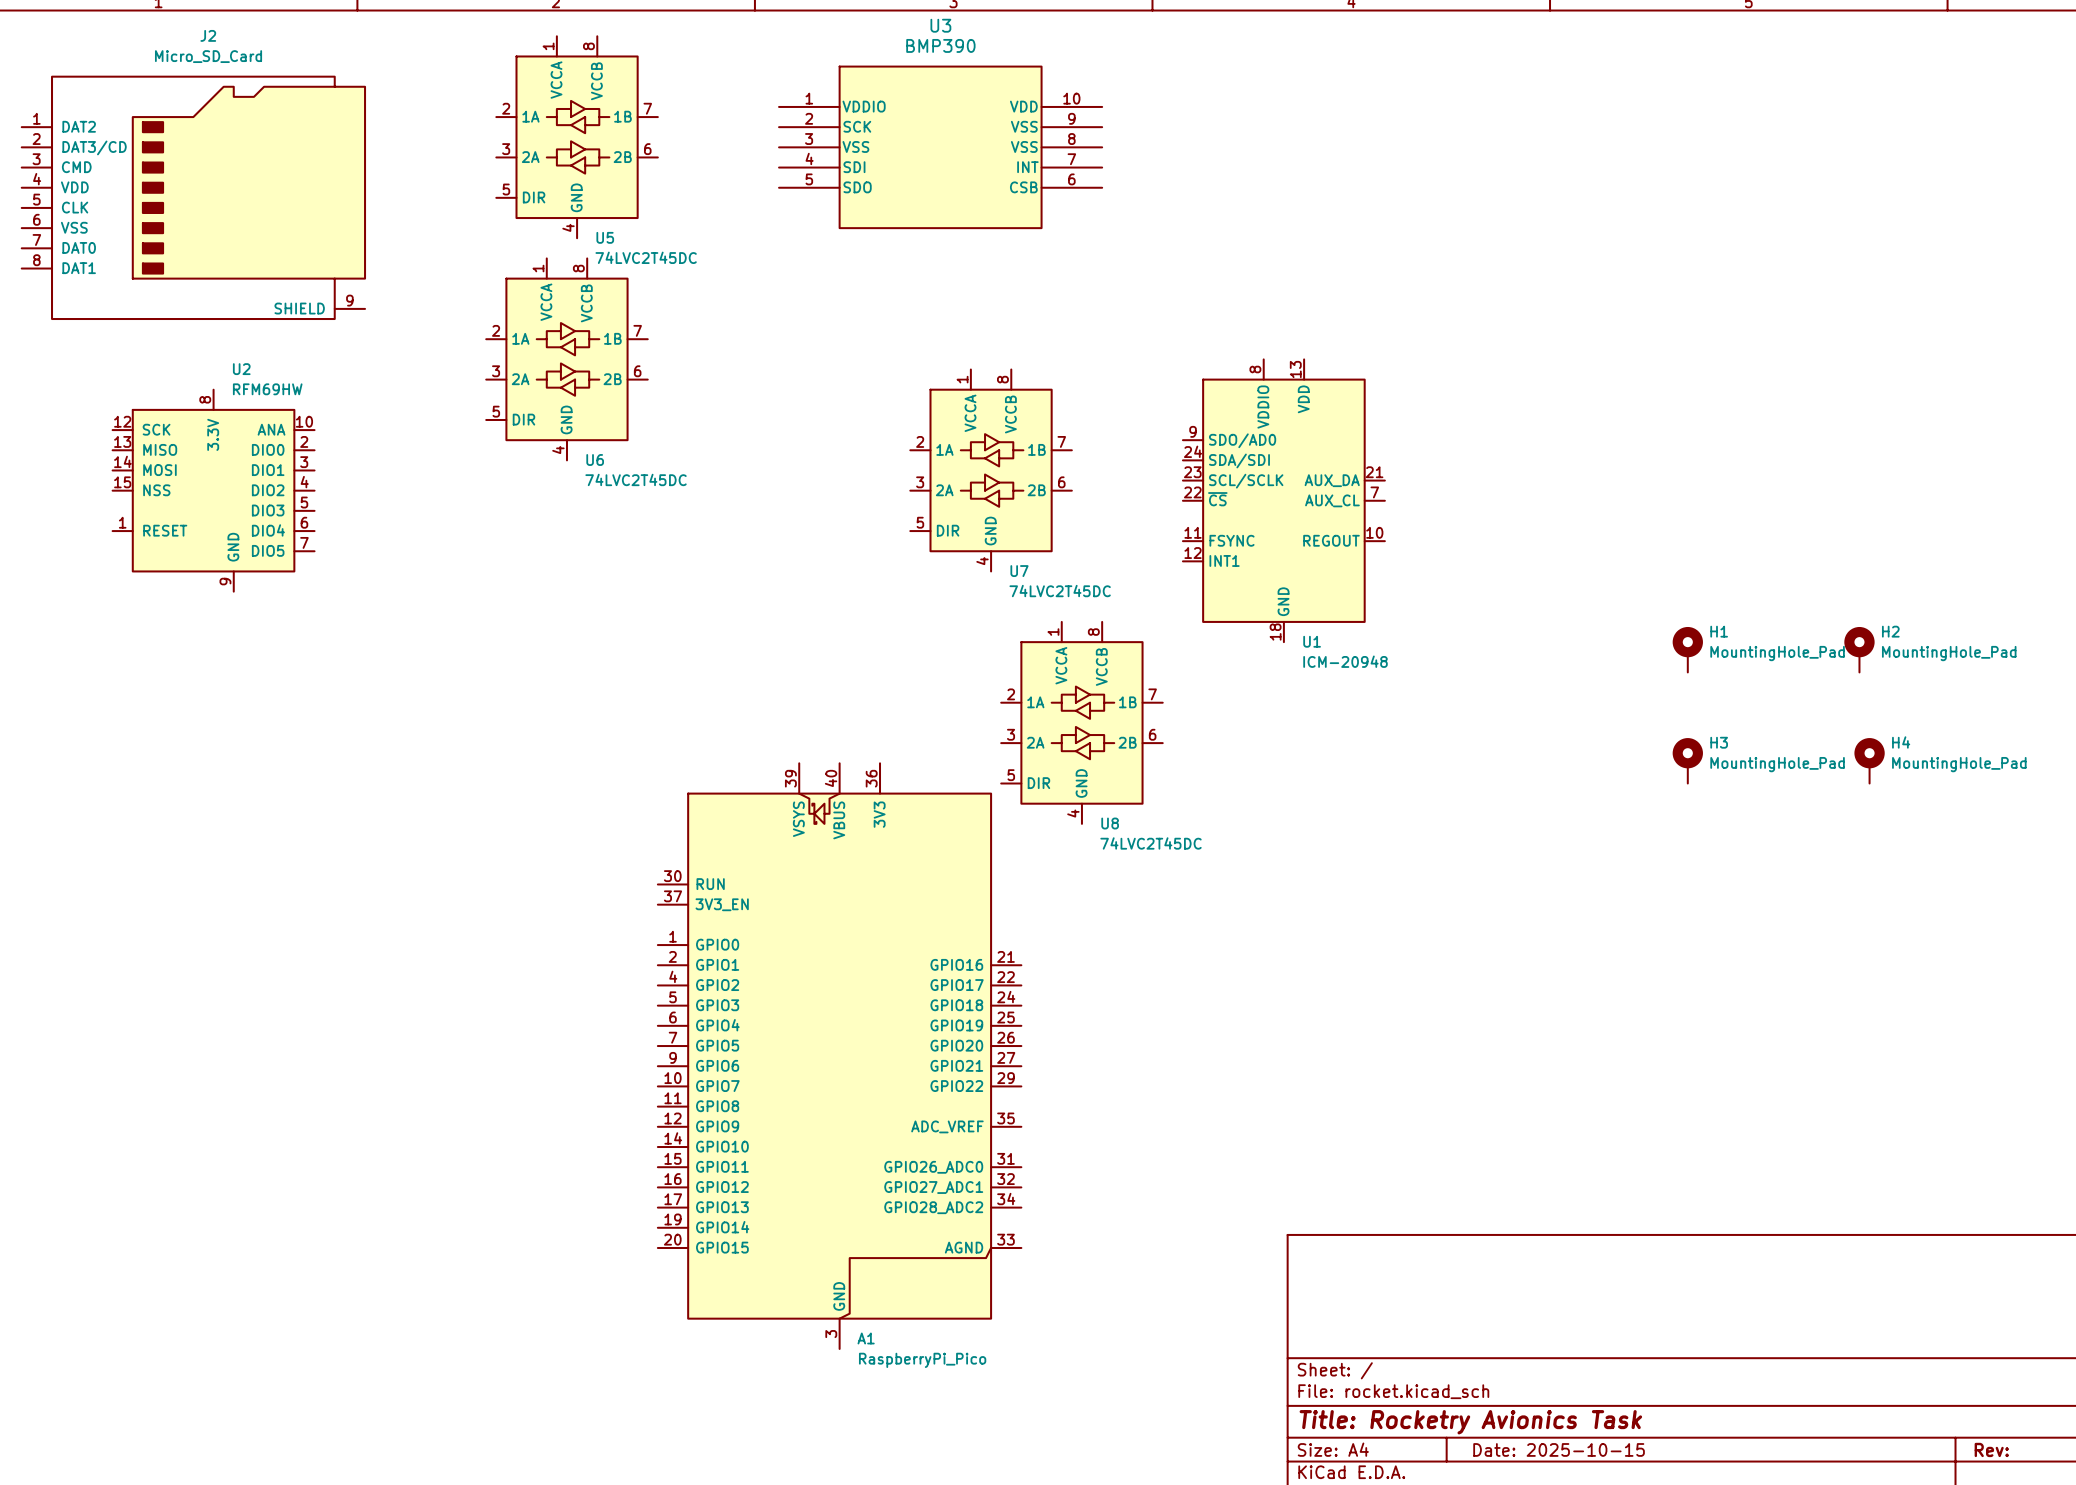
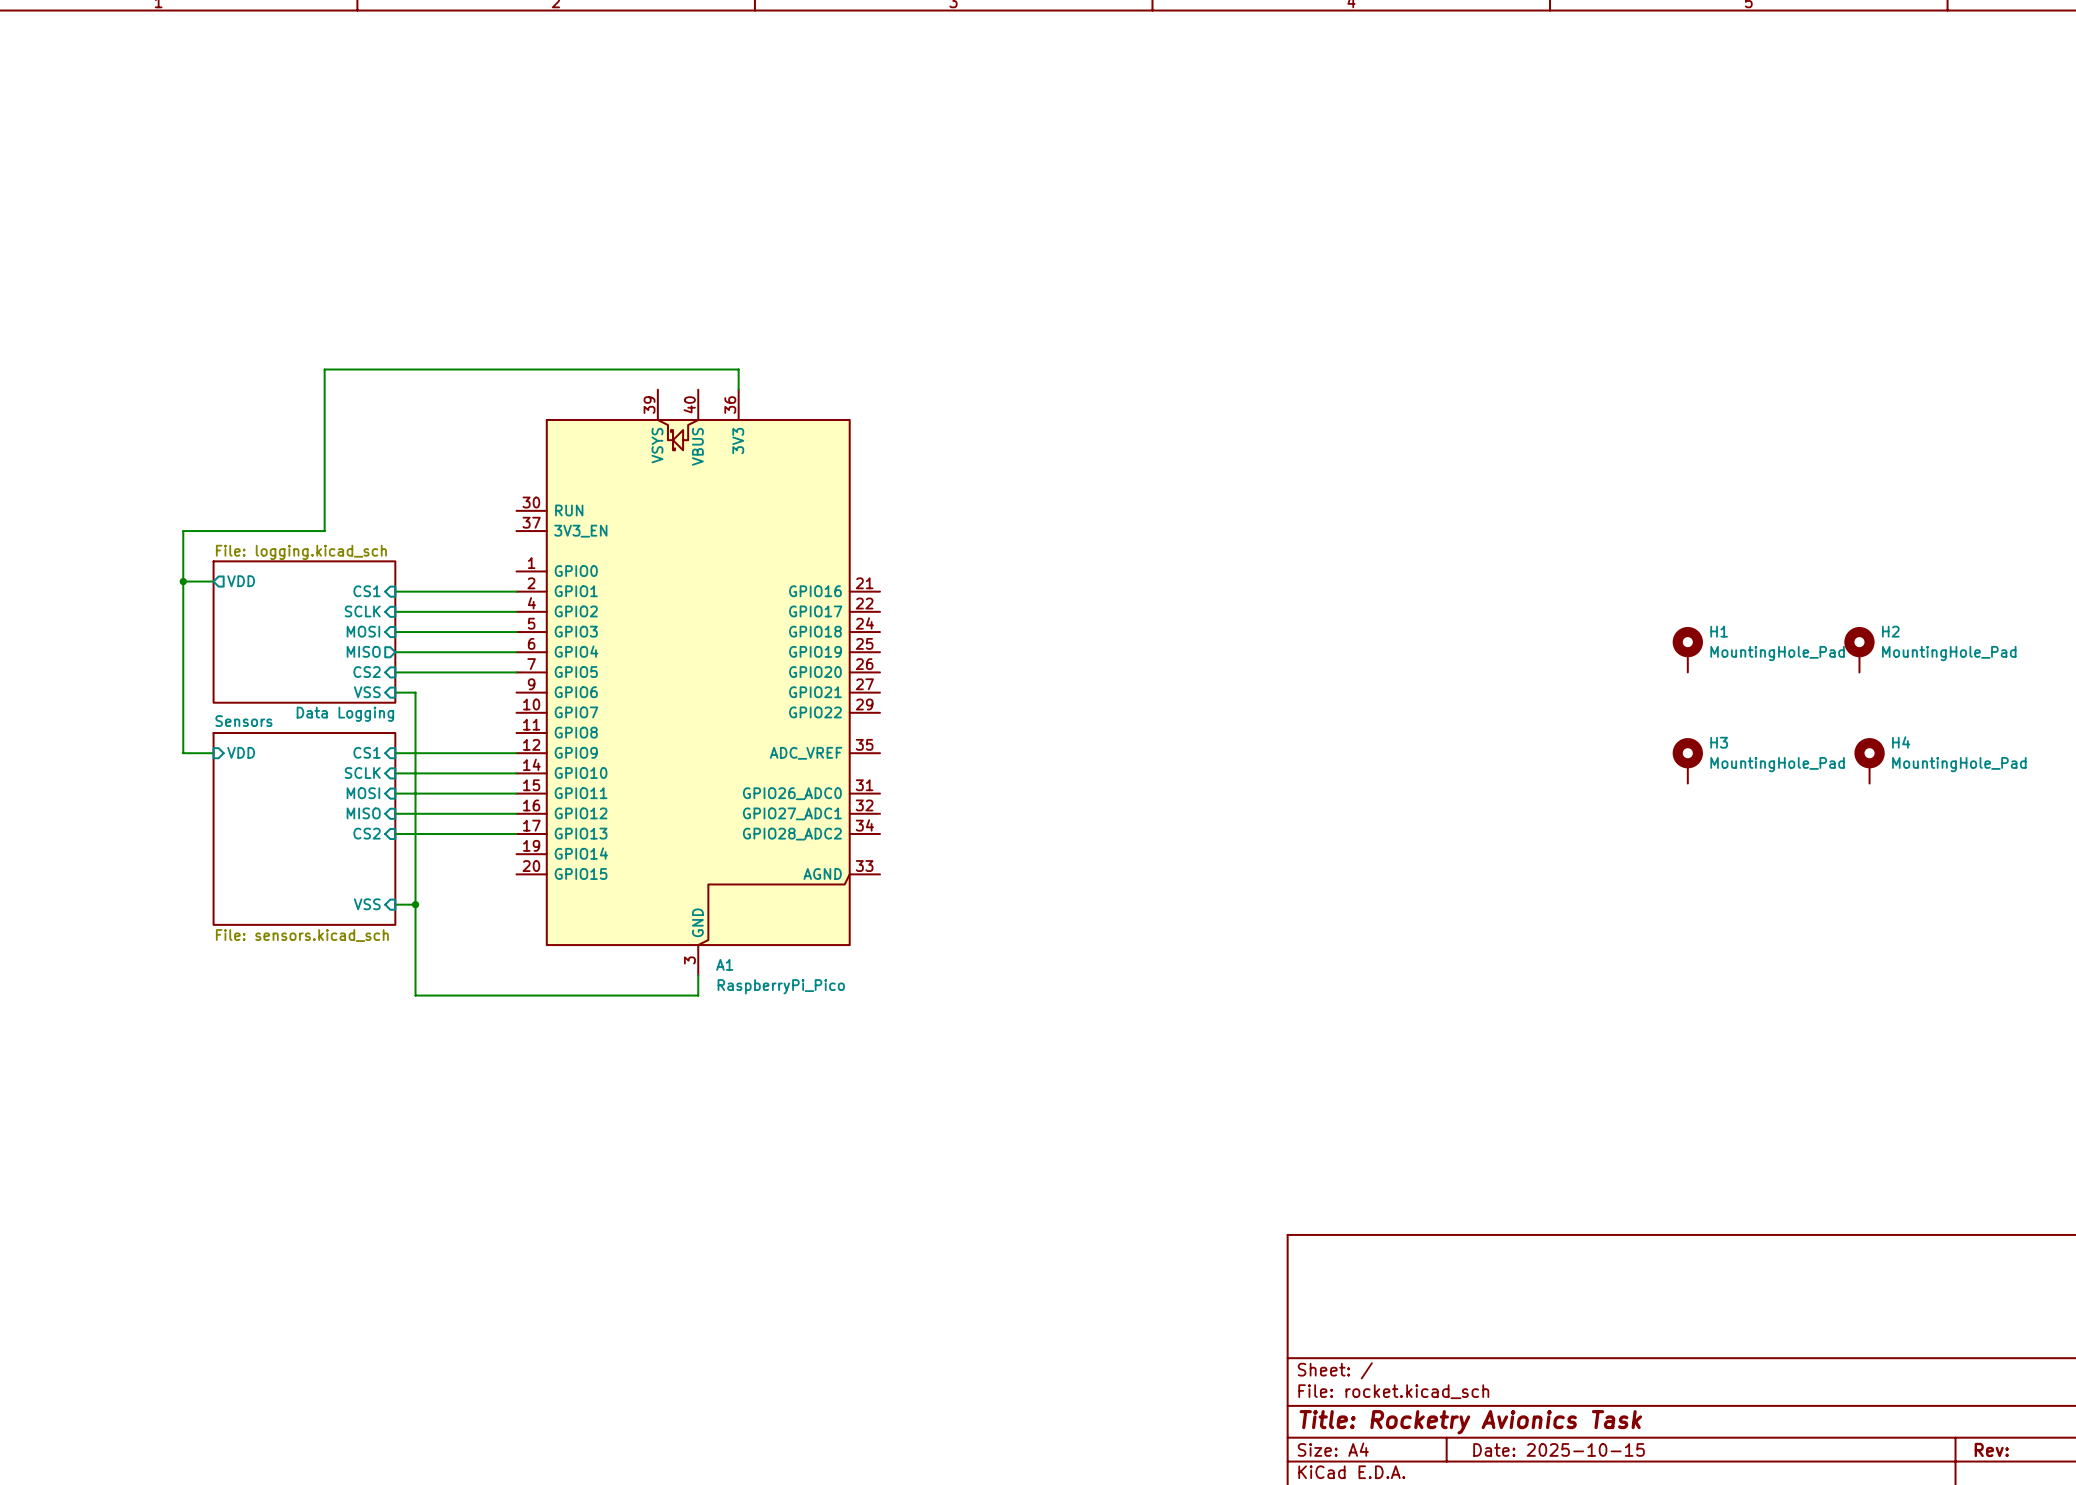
U5: 74LVC2T45DC (577, 137) -> none
U3: BMP390 (940, 147) -> none
J2: Micro_SD_Card (193, 197) -> none
U6: 74LVC2T45DC (566, 359) -> none
wire: none -> (738, 389) (738, 369) (324, 369) (324, 531) (183, 531) (183, 753) (213, 753)
U7: 74LVC2T45DC (991, 470) -> none
U2: RFM69HW (213, 490) -> none
U1: ICM-20948 (1283, 500) -> none
wire: none -> (183, 581) (213, 581)
junction: none -> (183, 581)
sheet pin: none -> VDD (241, 581)
sheet pin: none -> CS1 (367, 591)
wire: none -> (395, 591) (516, 591)
sheet pin: none -> SCLK (362, 611)
wire: none -> (395, 611) (516, 611)
sheet pin: none -> MOSI (363, 631)
sheet Data Logging: none -> File: logging.kicad_sch (304, 632)
wire: none -> (395, 632) (516, 632)
sheet pin: none -> MISO (363, 651)
wire: none -> (395, 652) (516, 652)
sheet pin: none -> CS2 (367, 672)
wire: none -> (395, 672) (516, 672)
sheet pin: none -> VSS (367, 692)
wire: none -> (395, 692) (415, 692) (415, 995) (698, 995) (698, 975)
U8: 74LVC2T45DC (1081, 722) -> none
sheet pin: none -> VDD (241, 752)
sheet pin: none -> CS1 (367, 752)
wire: none -> (395, 753) (516, 753)
sheet pin: none -> SCLK (362, 773)
wire: none -> (395, 773) (516, 773)
sheet pin: none -> MOSI (363, 793)
wire: none -> (395, 793) (516, 793)
sheet pin: none -> MISO (363, 813)
wire: none -> (395, 813) (516, 813)
sheet Sensors: none -> File: sensors.kicad_sch (304, 828)
sheet pin: none -> CS2 (367, 833)
wire: none -> (395, 833) (516, 833)
sheet pin: none -> VSS (367, 904)
wire: none -> (395, 904) (415, 904)
junction: none -> (415, 904)
A1 position: (839, 1056) -> (698, 682)

